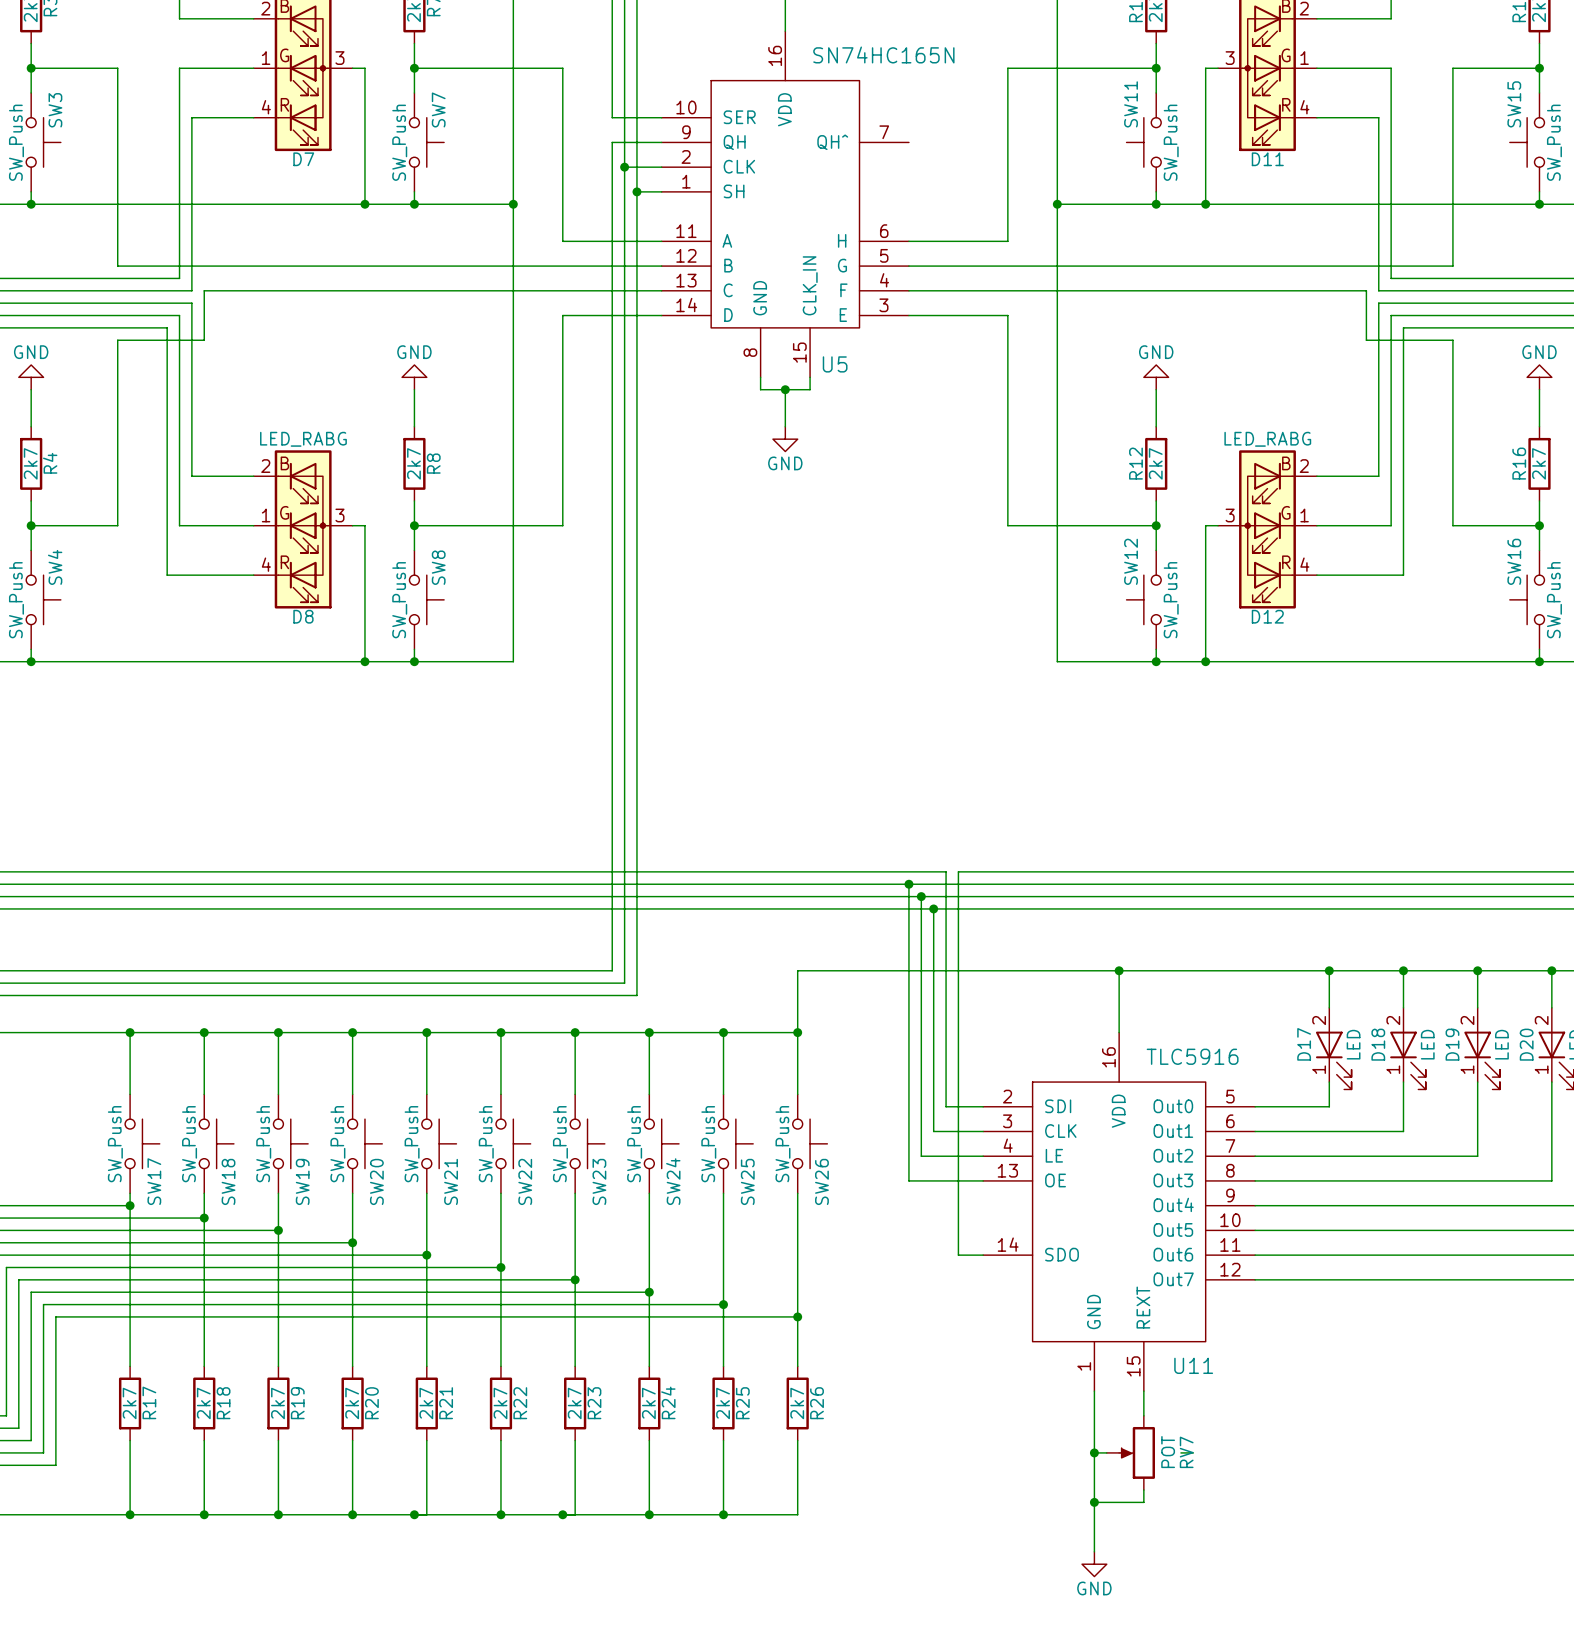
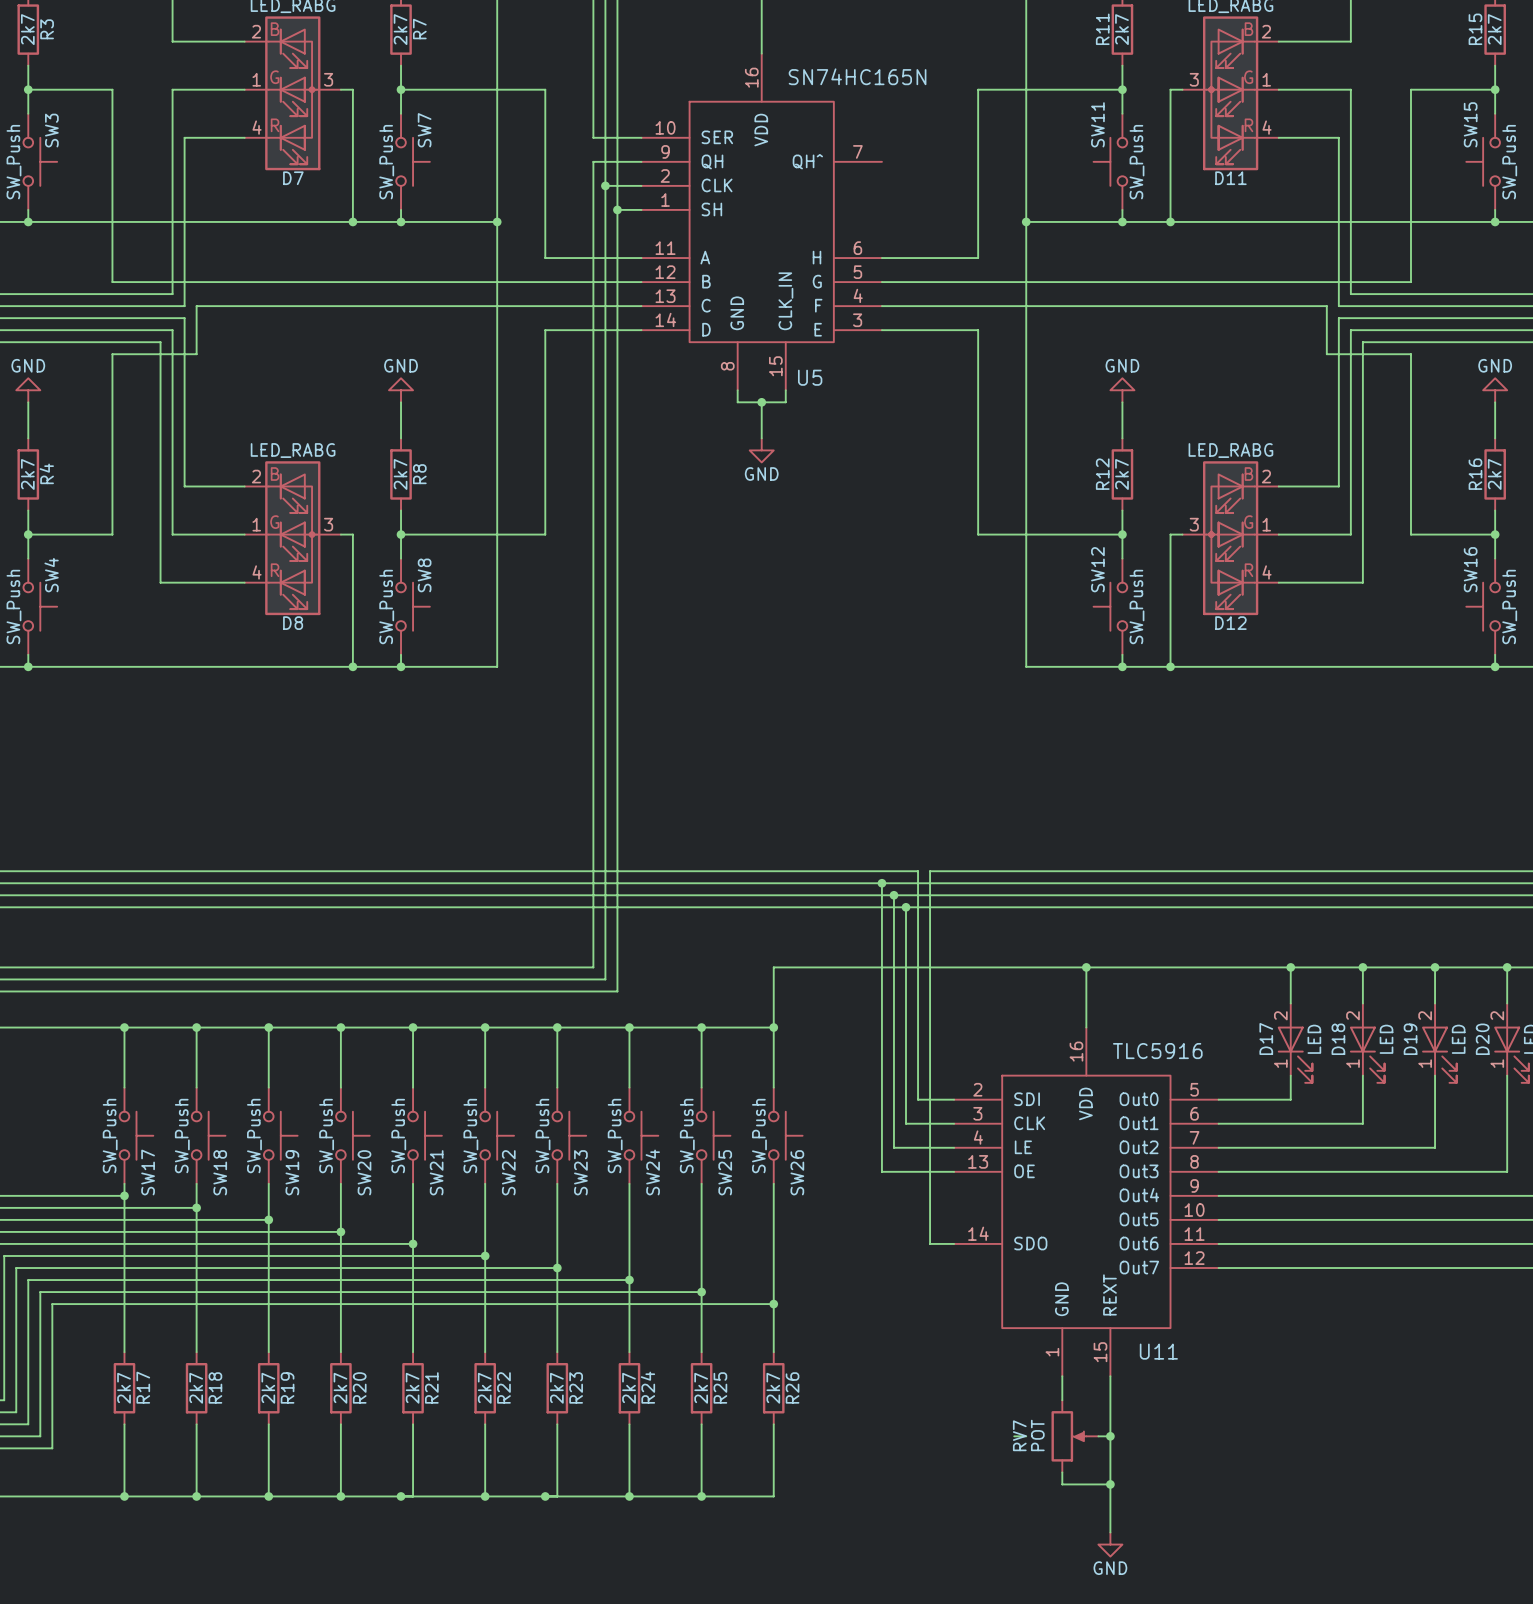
wire: (1094, 1415) (1094, 1490) -> (1110, 1400) (1110, 1472)
wire: (1094, 1452) (1106, 1452) -> (1098, 1436) (1110, 1436)
junction: (1094, 1452) -> none
RV7 flip: as is (1137, 1452) -> left-right (1068, 1436)
junction: none -> (1110, 1436)
wire: (1180, 1452) (1193, 1452) -> (1014, 1436) (1026, 1436)
wire: (1094, 1502) (1094, 1551) -> (1110, 1484) (1110, 1532)
junction: (1094, 1502) -> none
junction: none -> (1110, 1484)
power symbol position: GND (1094, 1564) -> GND (1110, 1544)

